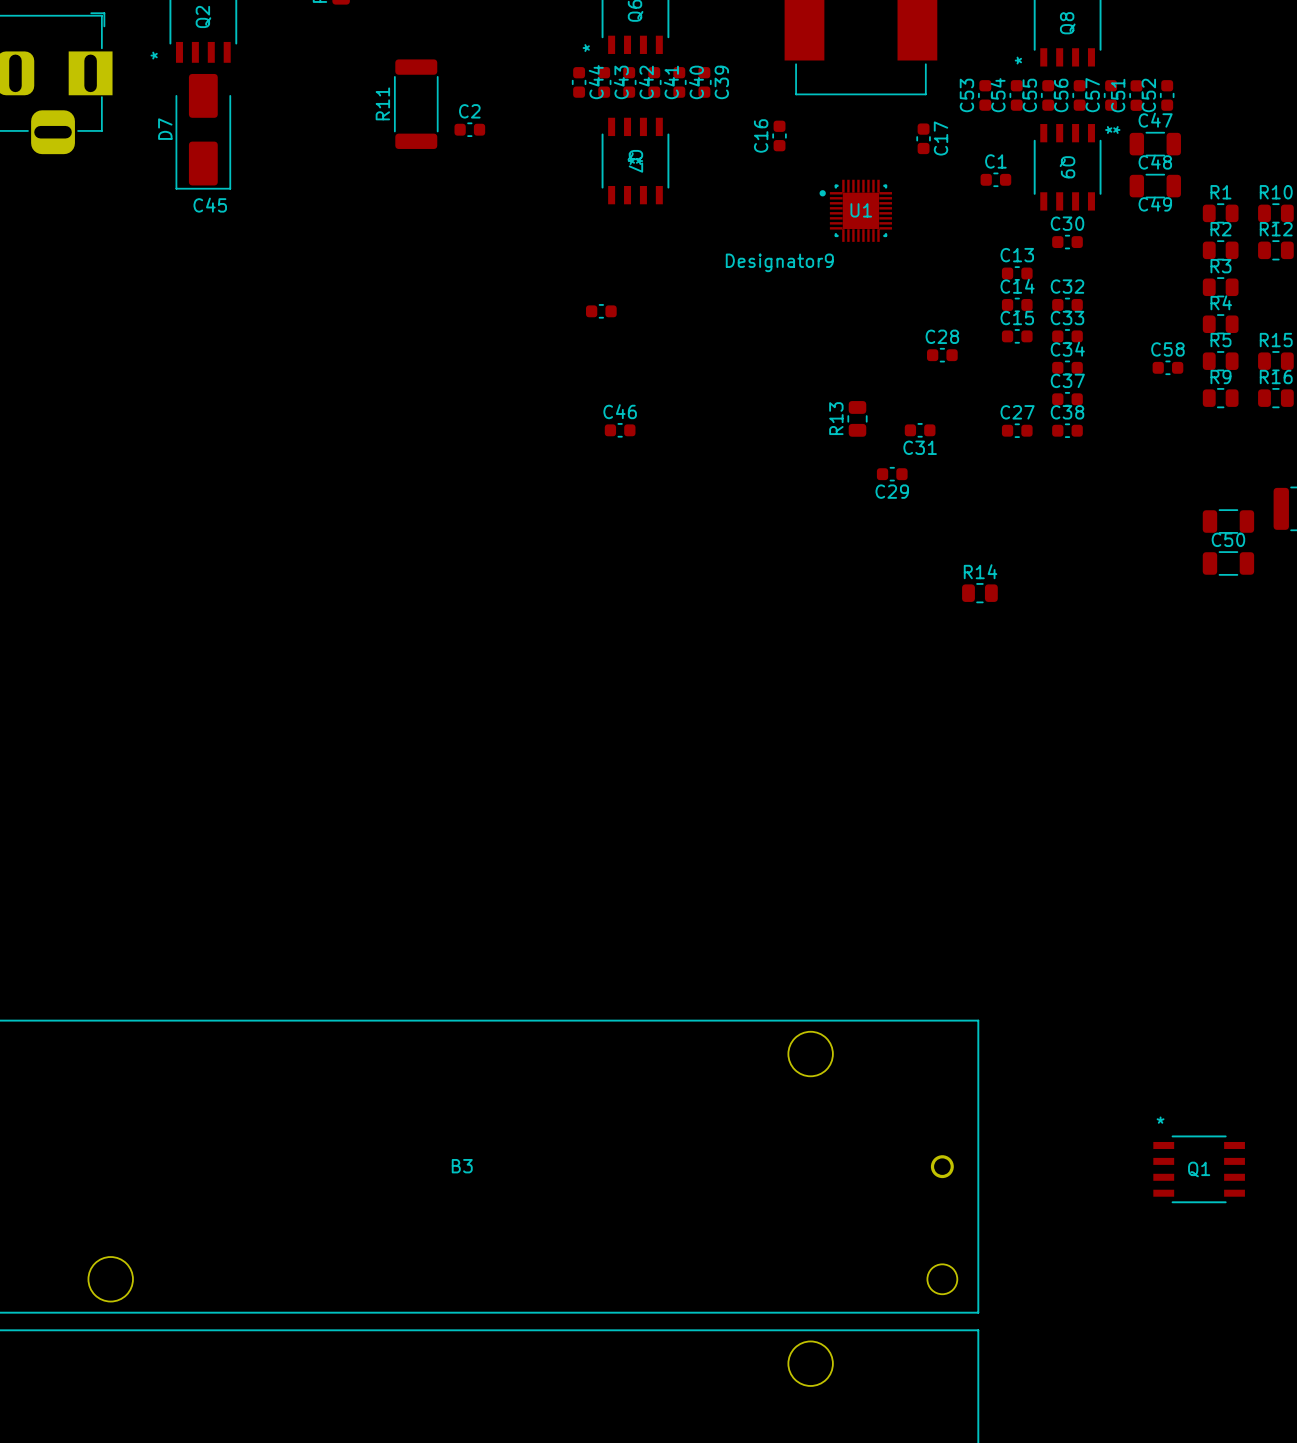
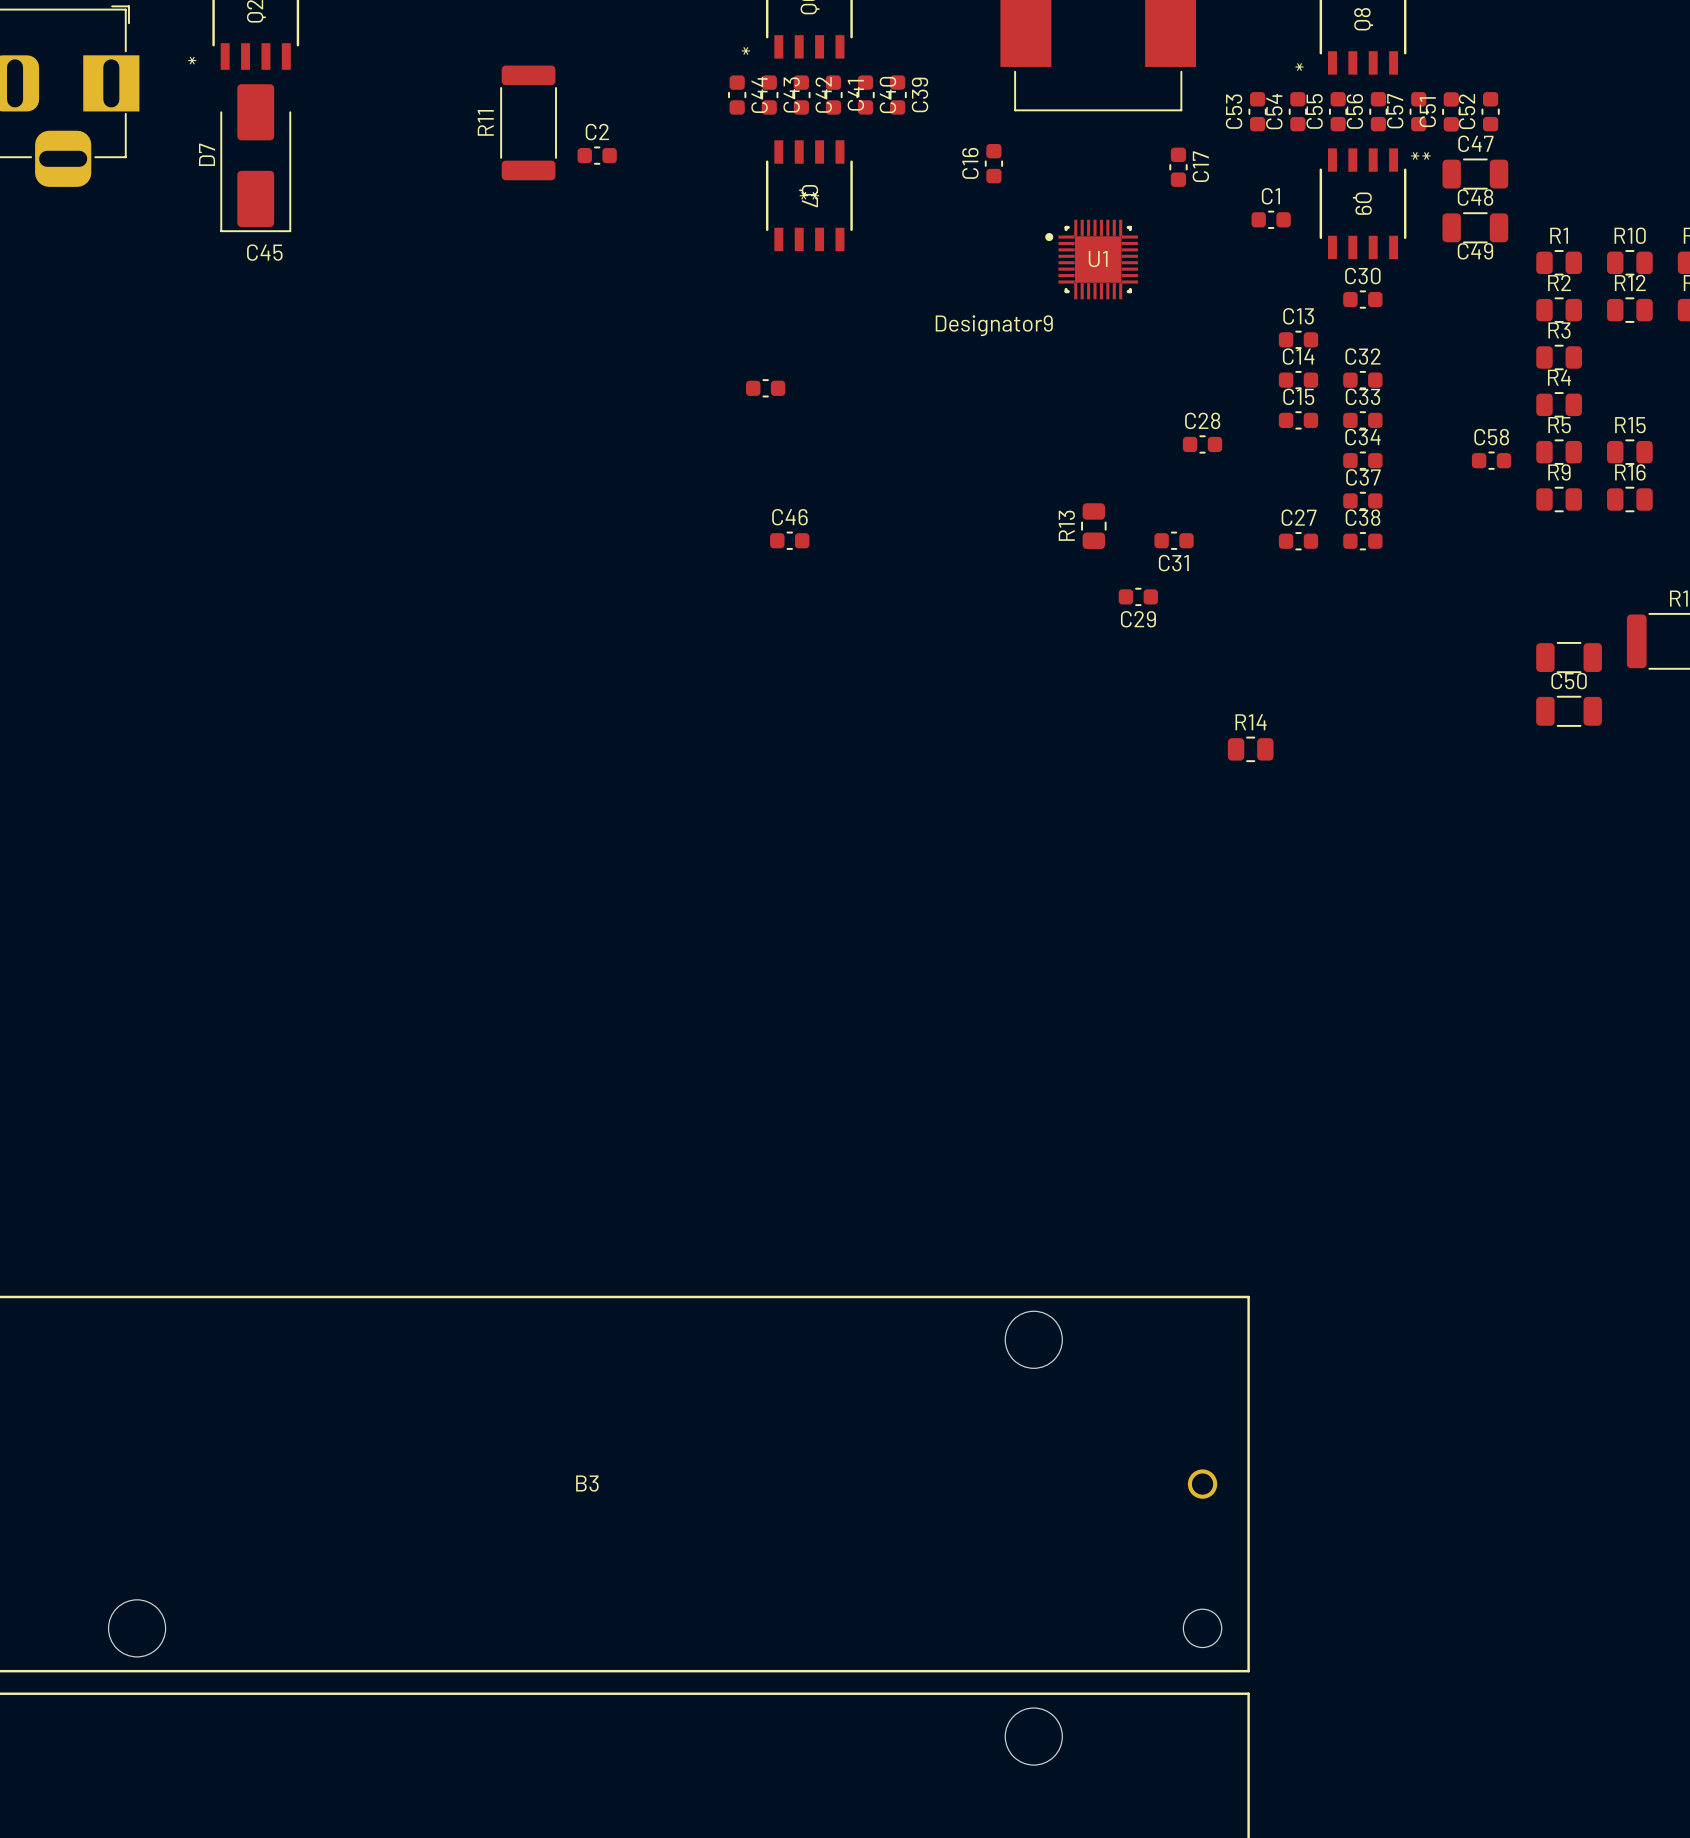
Q1: (1199, 1169) -> none

